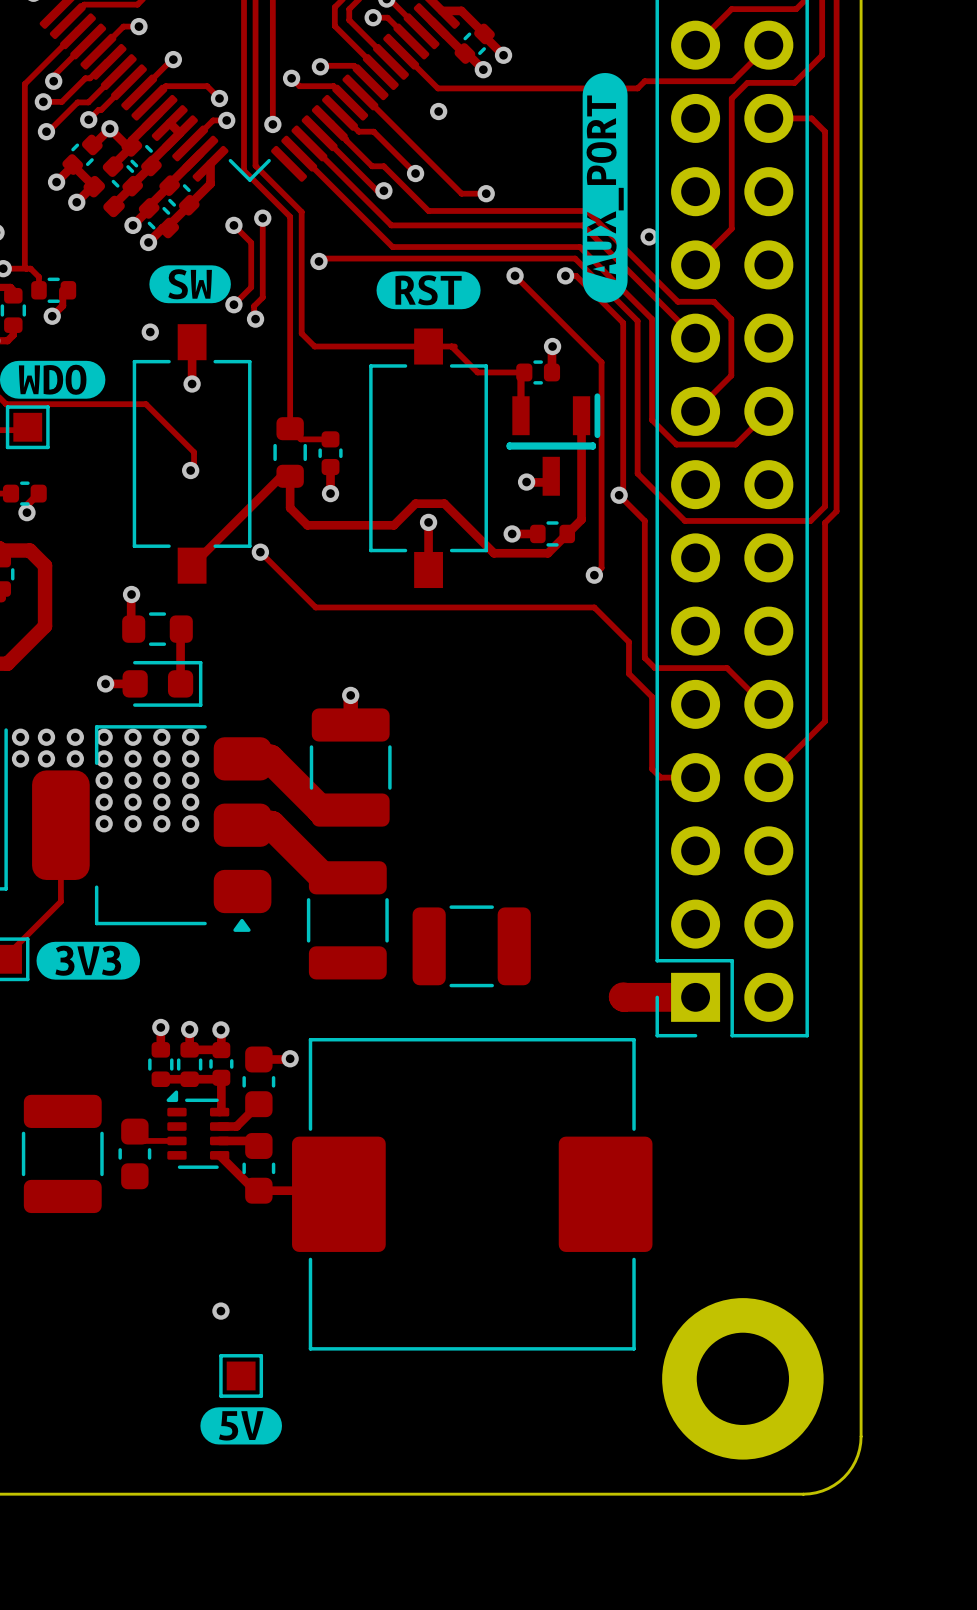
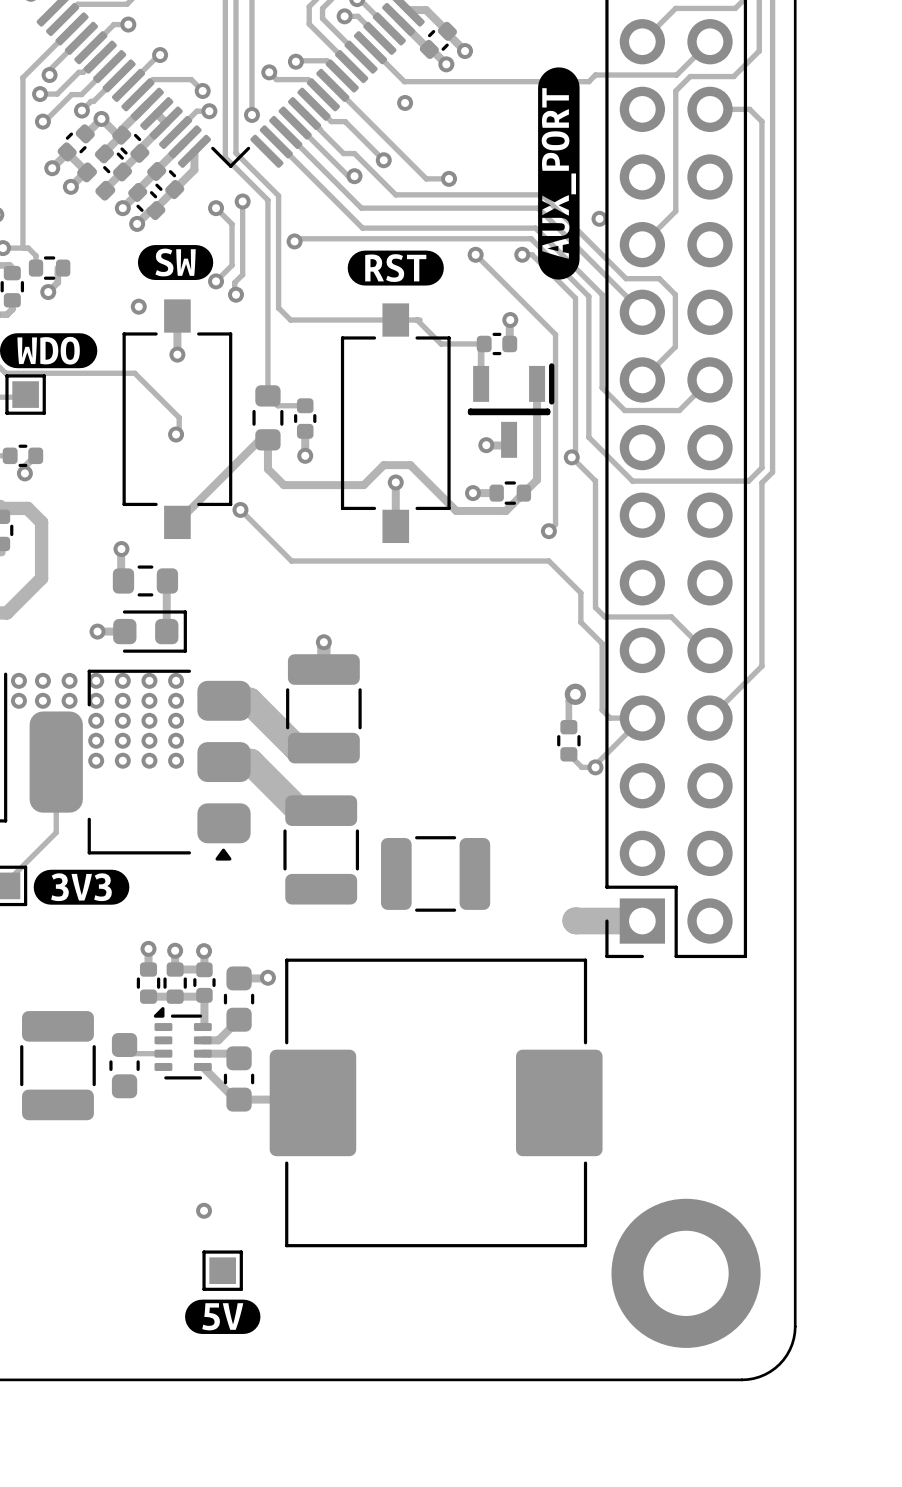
track: none -> (575, 694) (568, 700) (568, 727)
via: none -> (575, 694)
track: none -> (642, 718) (595, 764) (595, 767) (581, 767) (568, 754)
part: none -> (568, 740)
via: none -> (595, 767)

